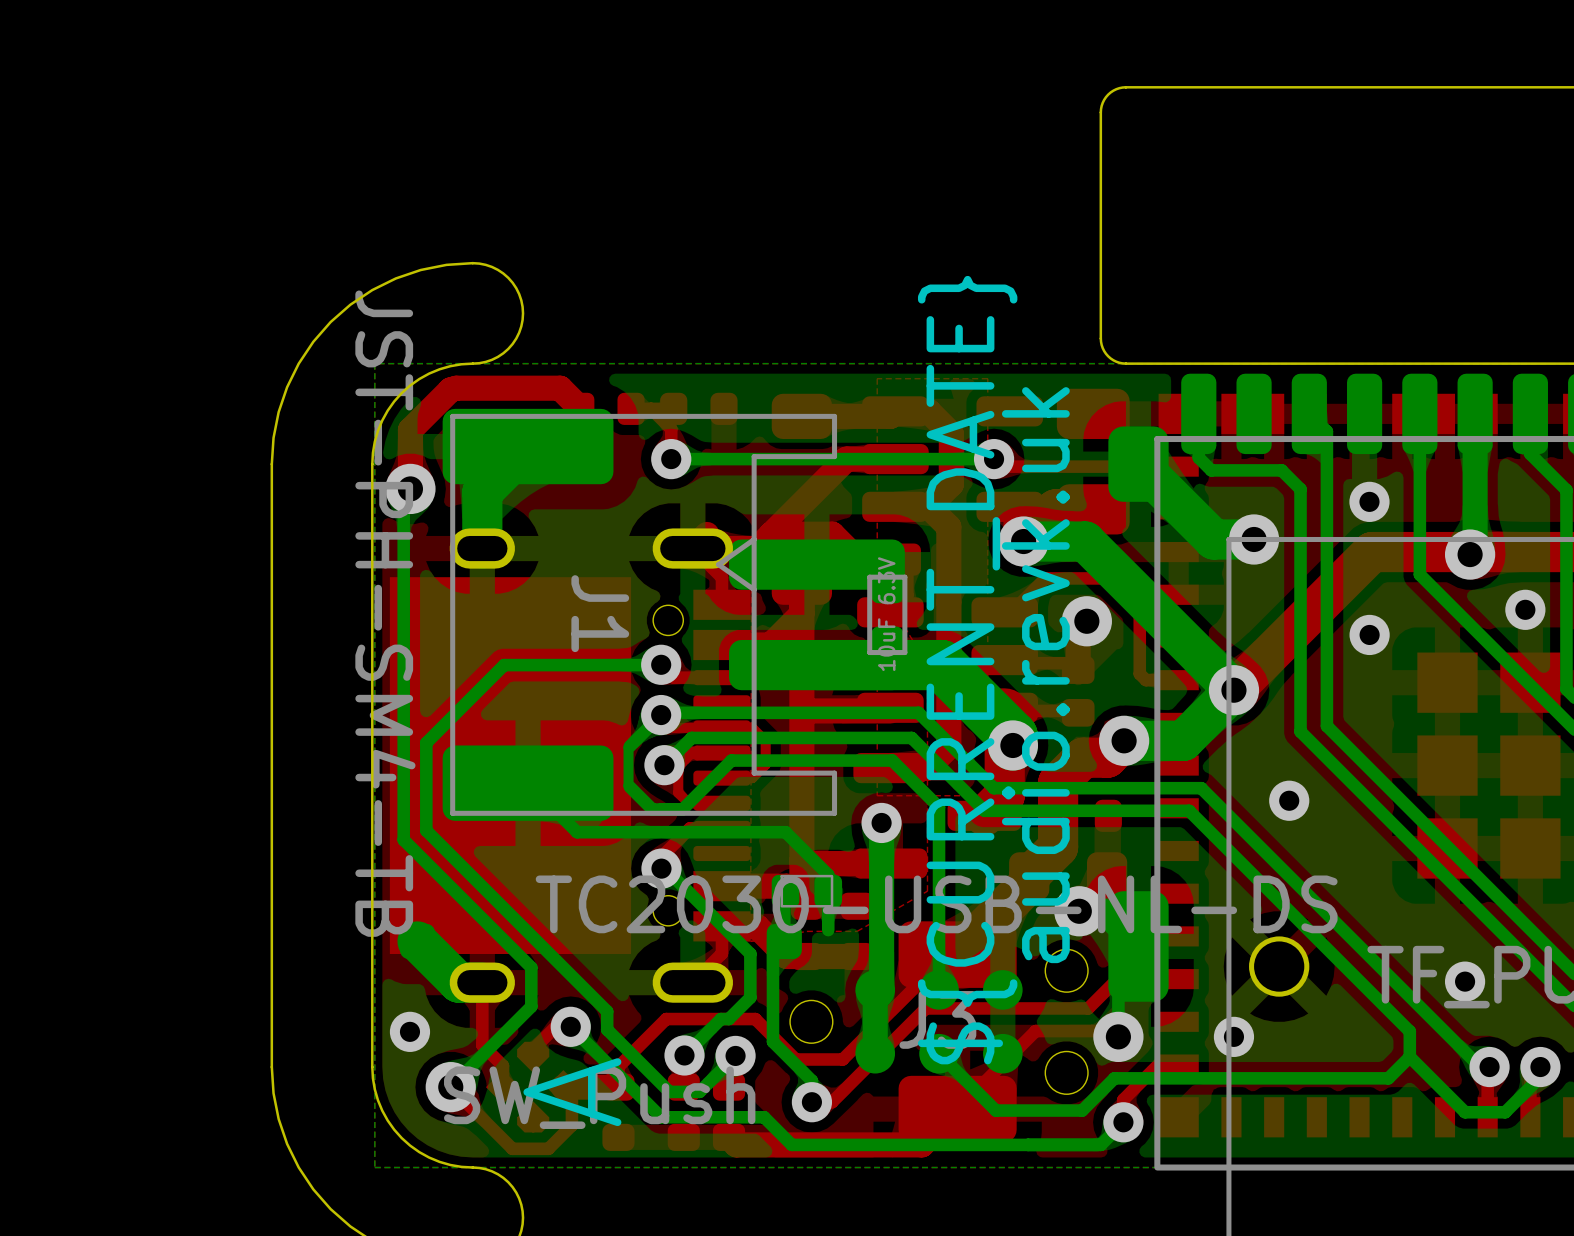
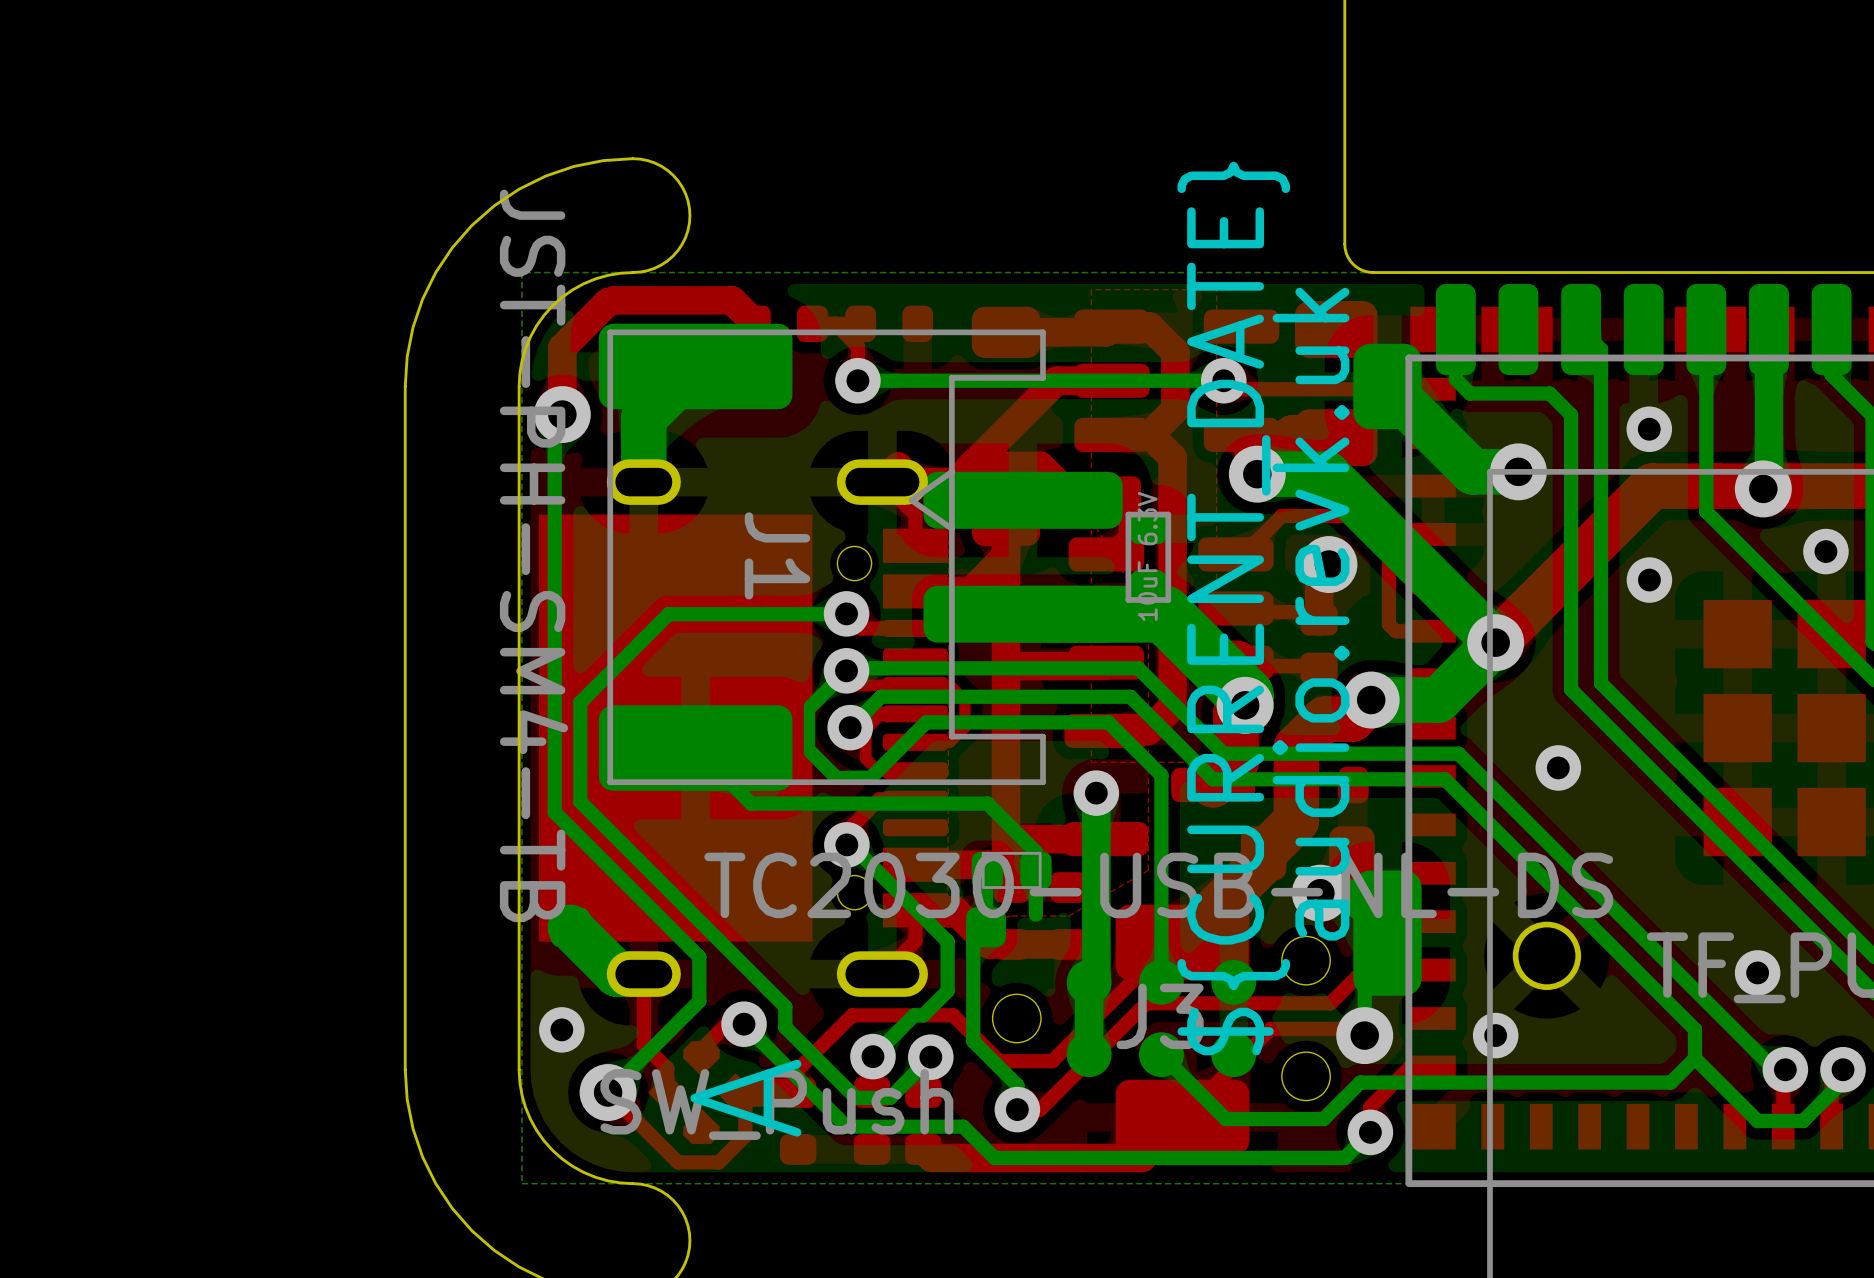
part position: (887, 614) -> (1148, 557)
text position: ${CURRENT_DATE} (967, 670) -> ${CURRENT_DATE} (1233, 608)
text position: audio.revk.uk (1035, 675) -> audio.revk.uk (1311, 614)

